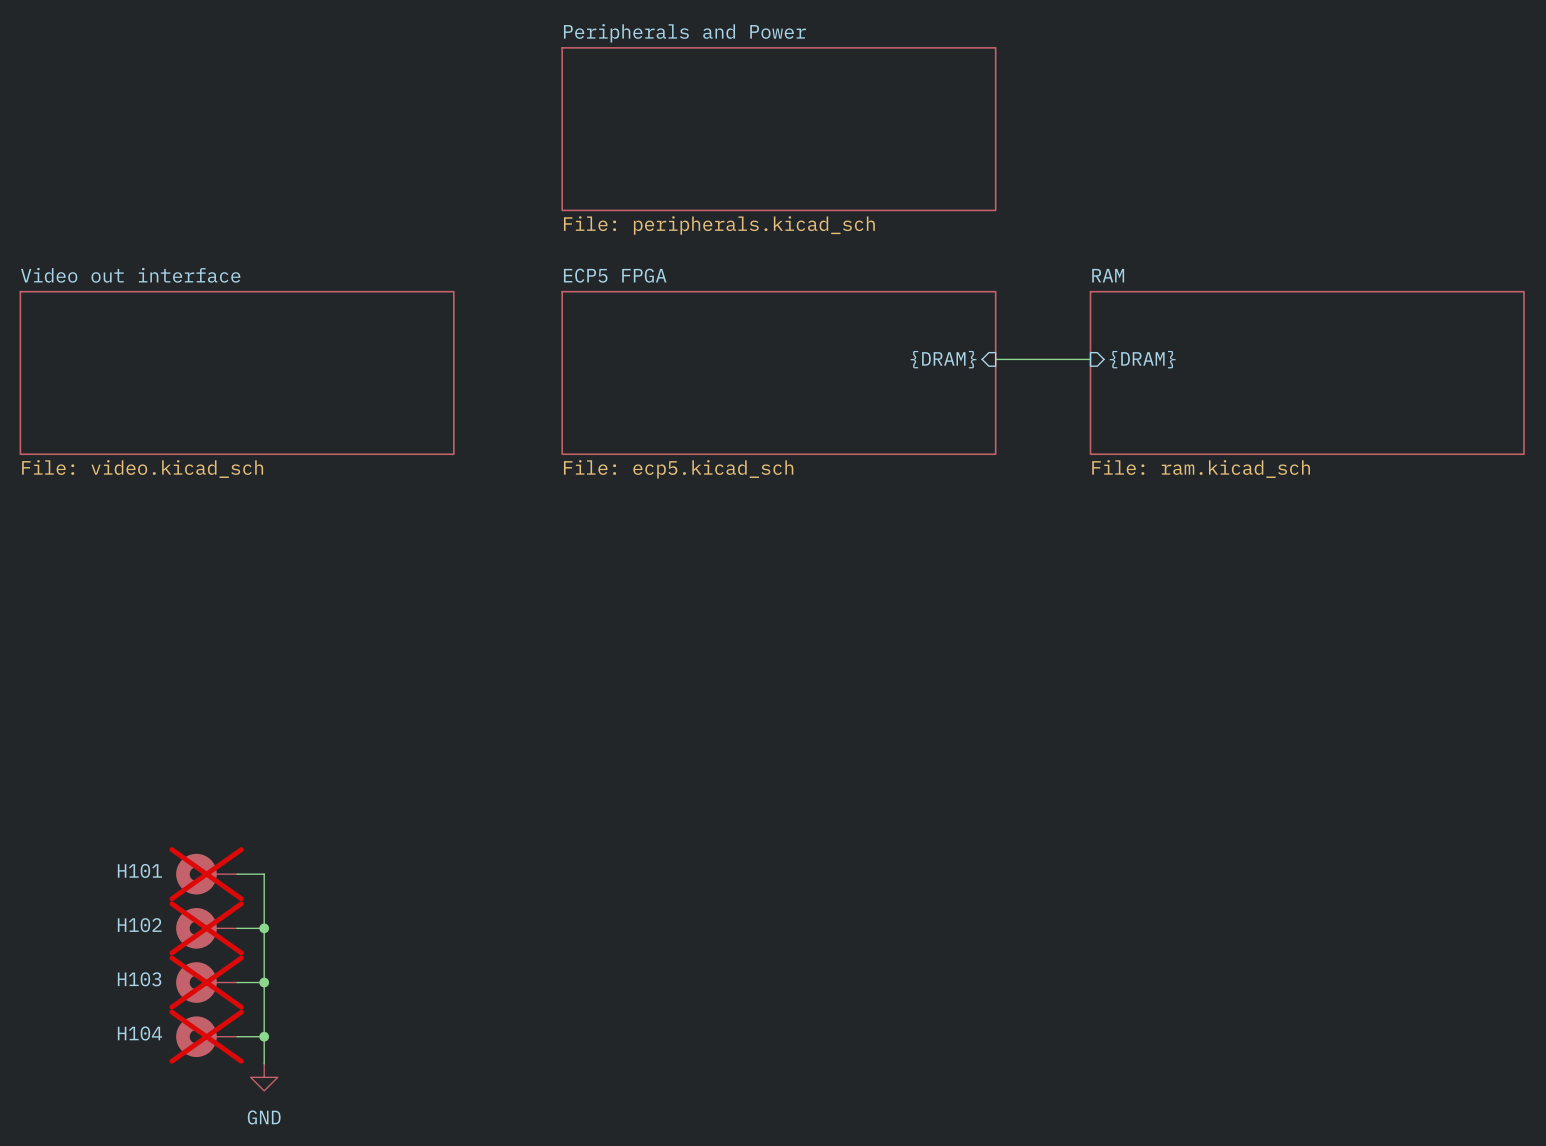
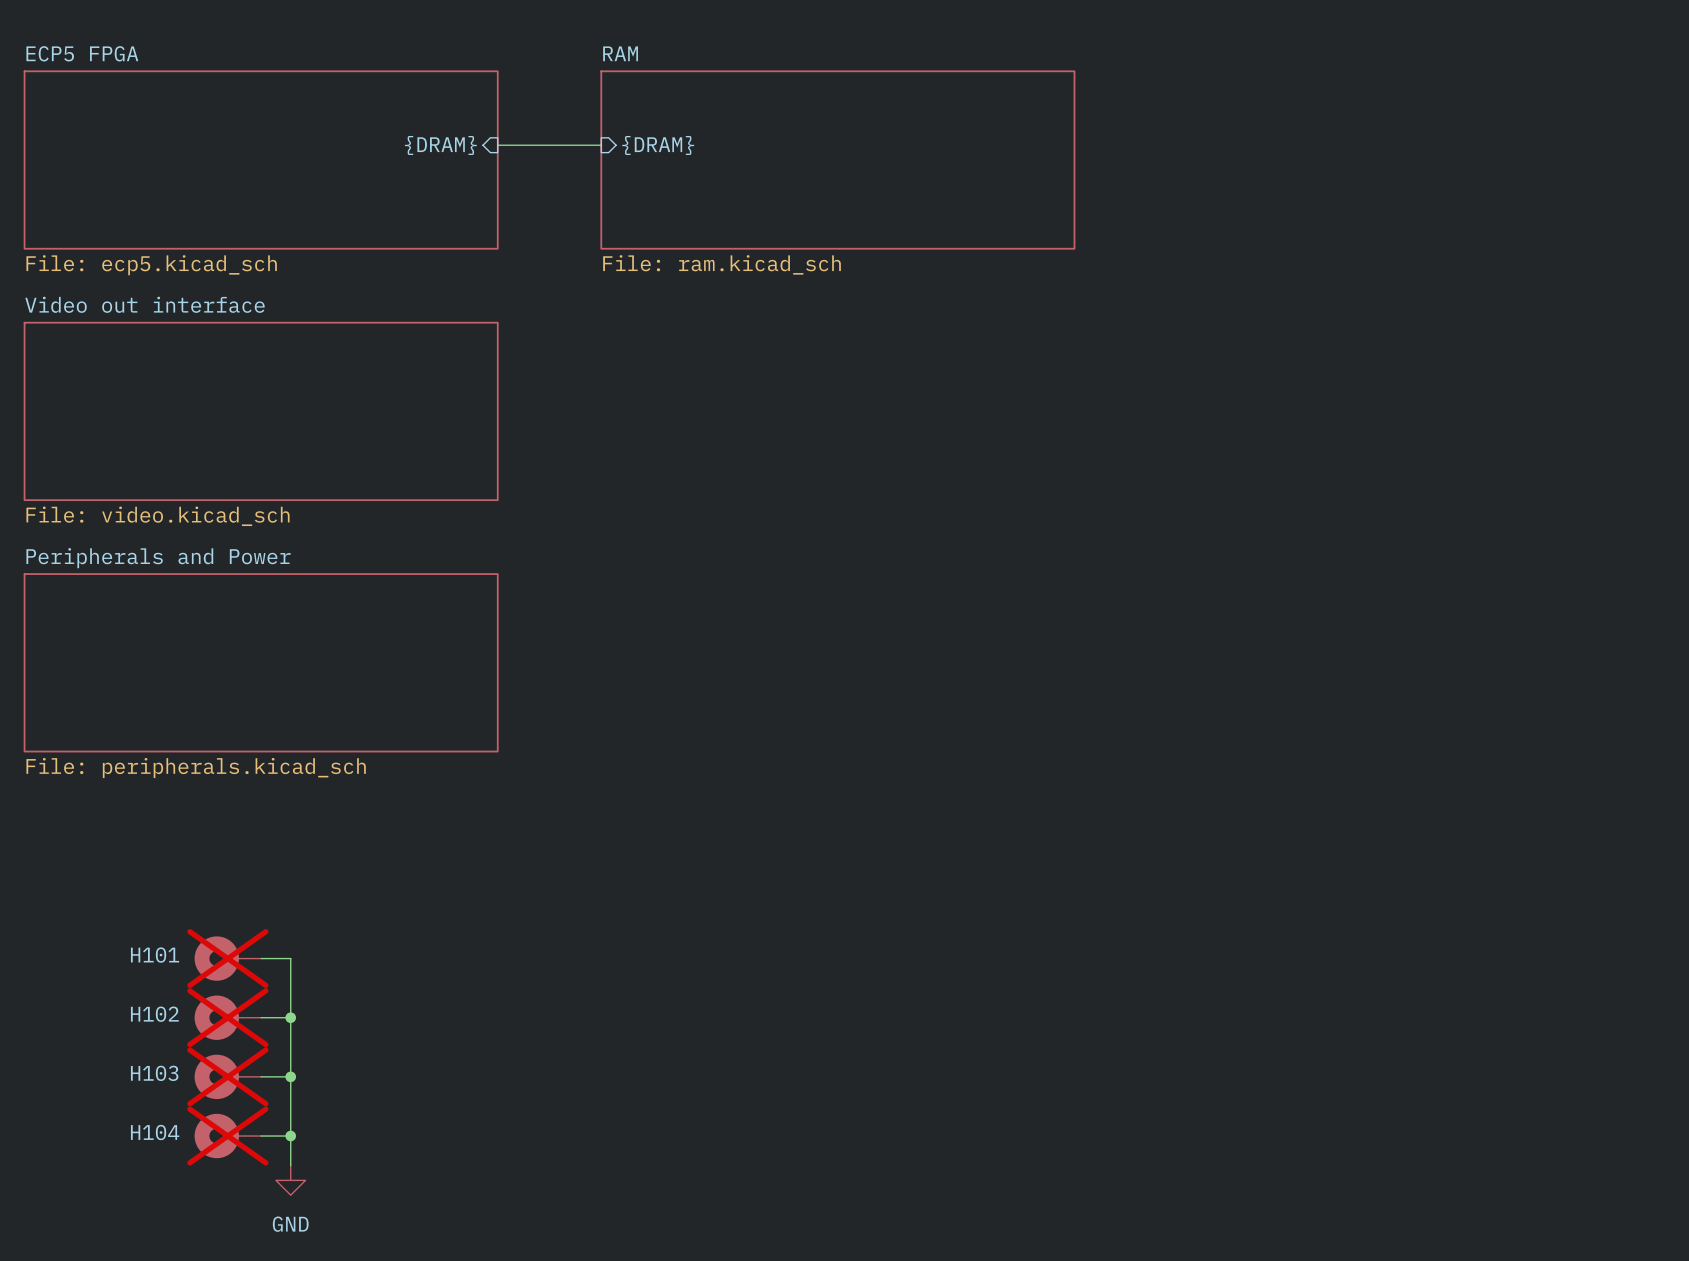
sheet pin: none -> {DRAM} (440, 145)
wire: none -> (497, 145) (601, 145)
sheet pin: none -> {DRAM} (658, 145)
sheet Peripherals and Power: File: peripherals.kicad_sch (778, 129) -> none
sheet RAM: none -> File: ram.kicad_sch (837, 160)
sheet pin: {DRAM} (943, 359) -> none
wire: (995, 359) (1090, 359) -> none
sheet pin: {DRAM} (1142, 359) -> none
sheet ECP5 FPGA position: (778, 372) -> (261, 160)
sheet RAM: File: ram.kicad_sch (1307, 372) -> none
sheet Peripherals and Power: none -> File: peripherals.kicad_sch (261, 662)

